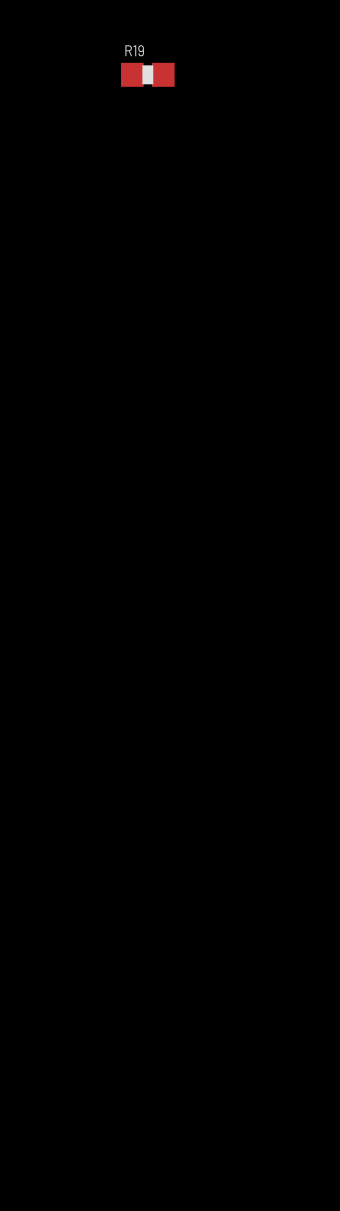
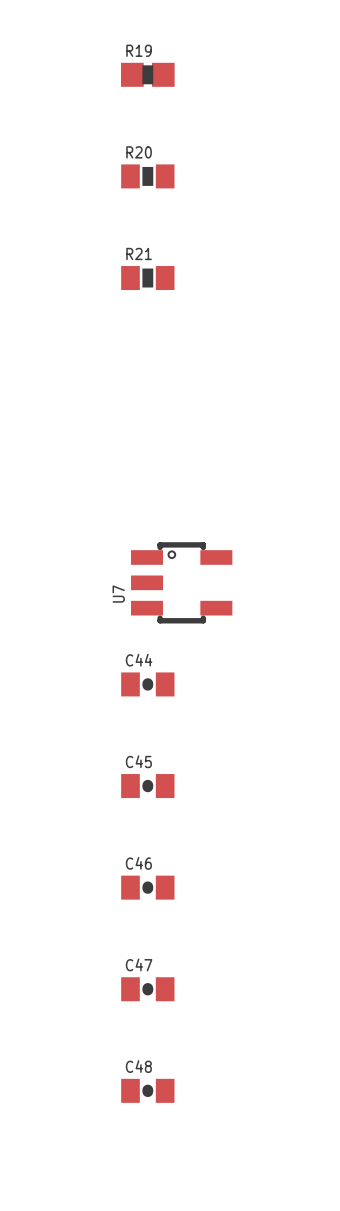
R20: none -> (147, 176)
R21: none -> (147, 278)
U7: none -> (181, 582)
C44: none -> (147, 684)
C45: none -> (147, 786)
C46: none -> (147, 887)
C47: none -> (147, 989)
C48: none -> (147, 1090)

